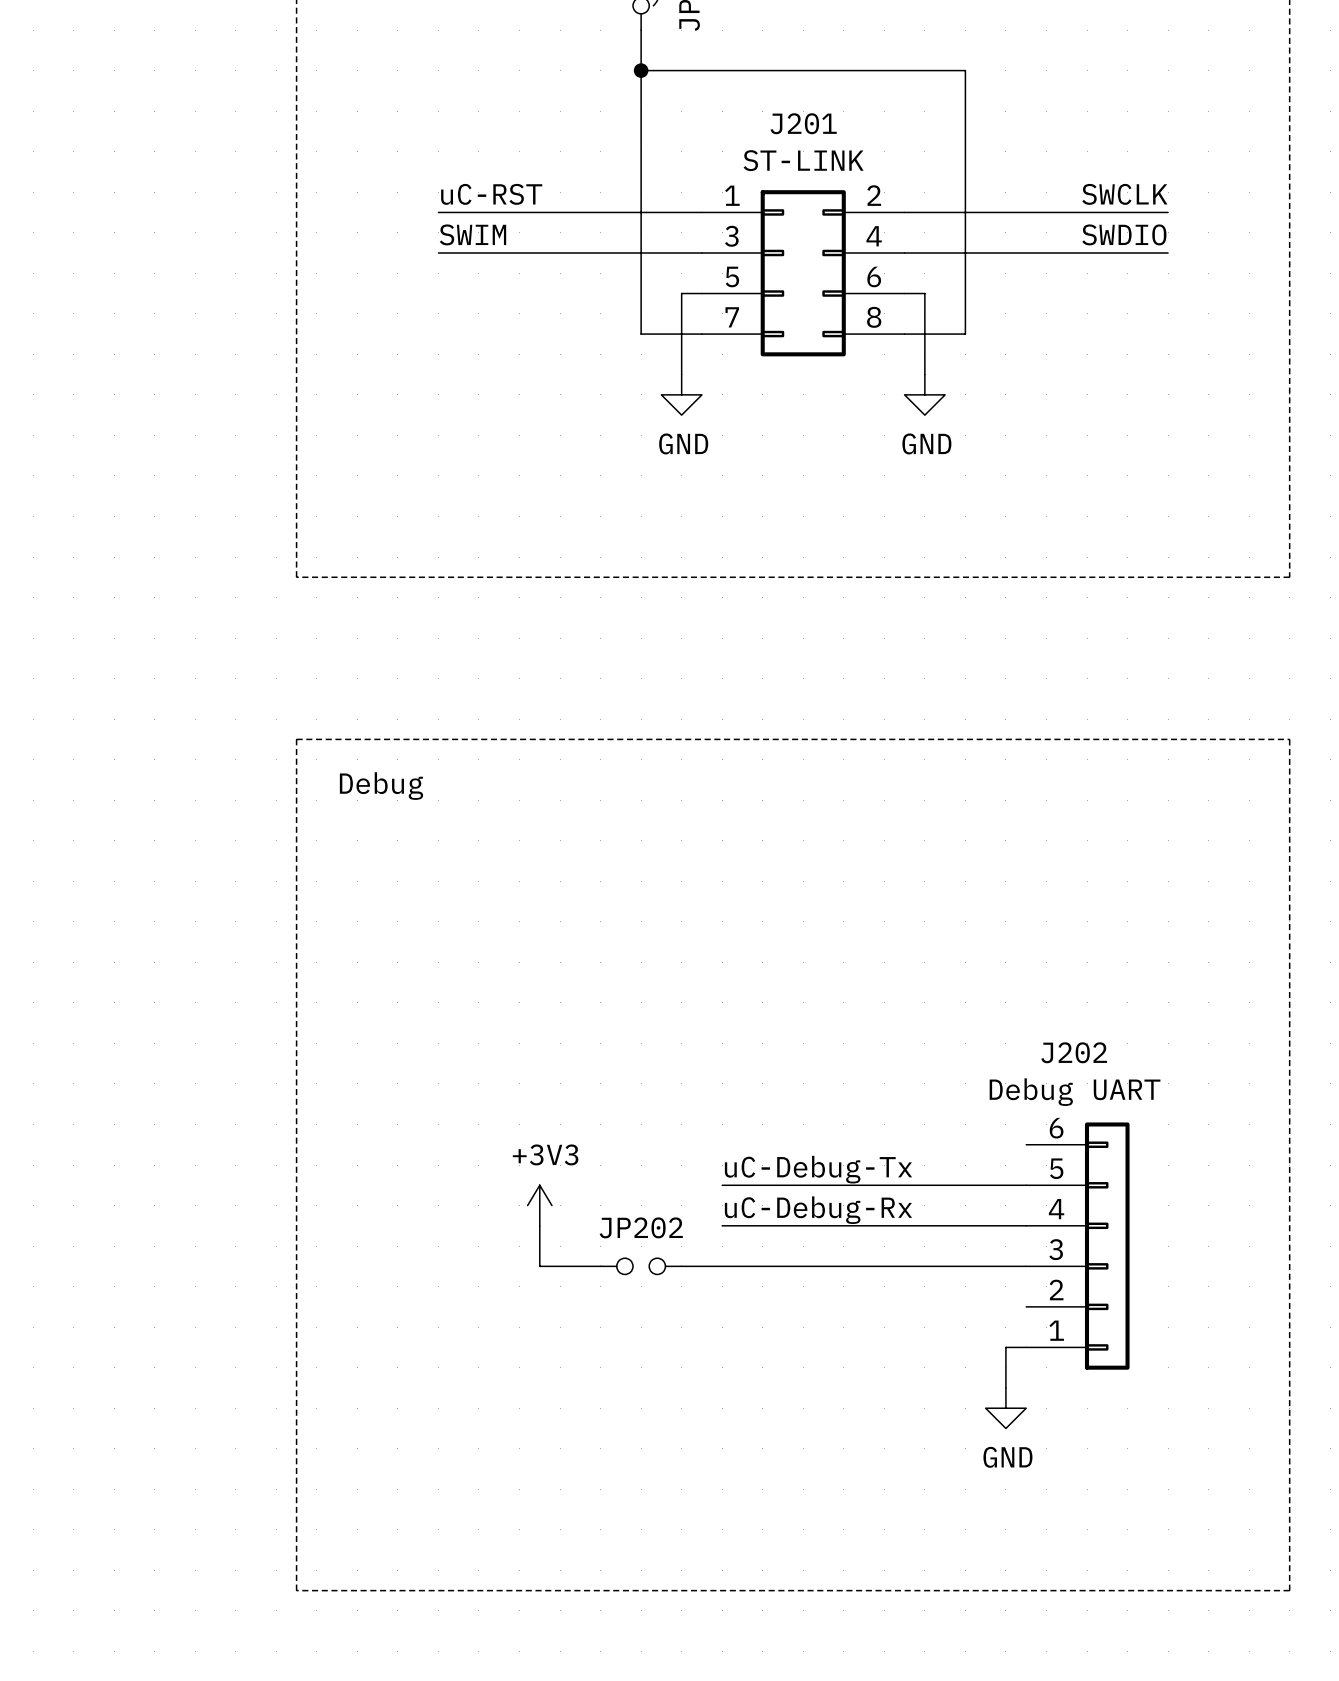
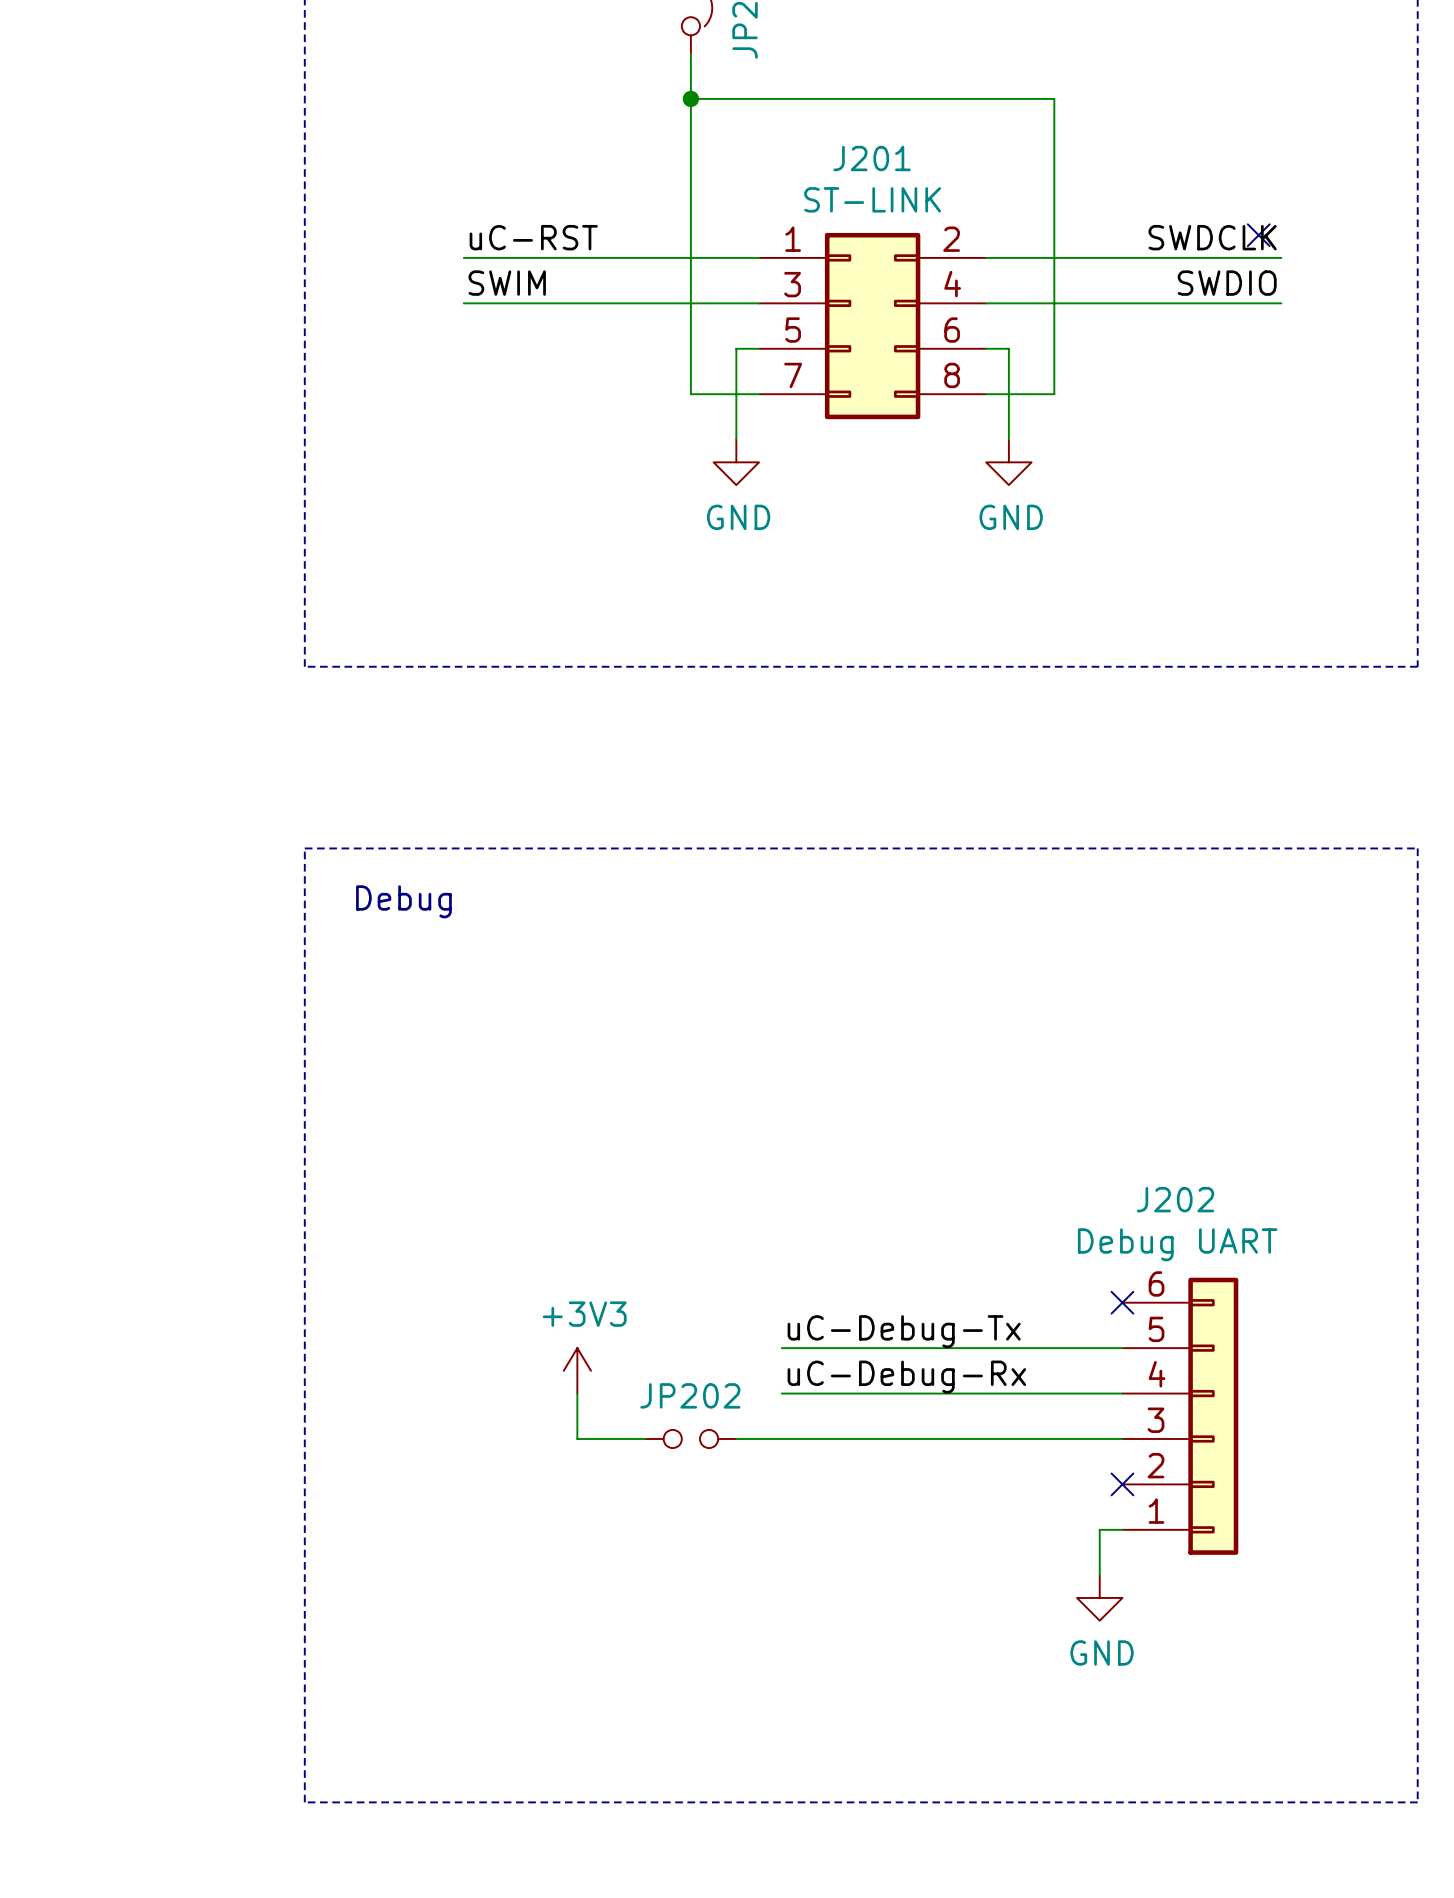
no-connect mark: none -> (1258, 235)
label: SWCLK (1124, 194) -> SWDCLK (1212, 237)
no-connect mark: none -> (1122, 1302)
no-connect mark: none -> (1122, 1484)

